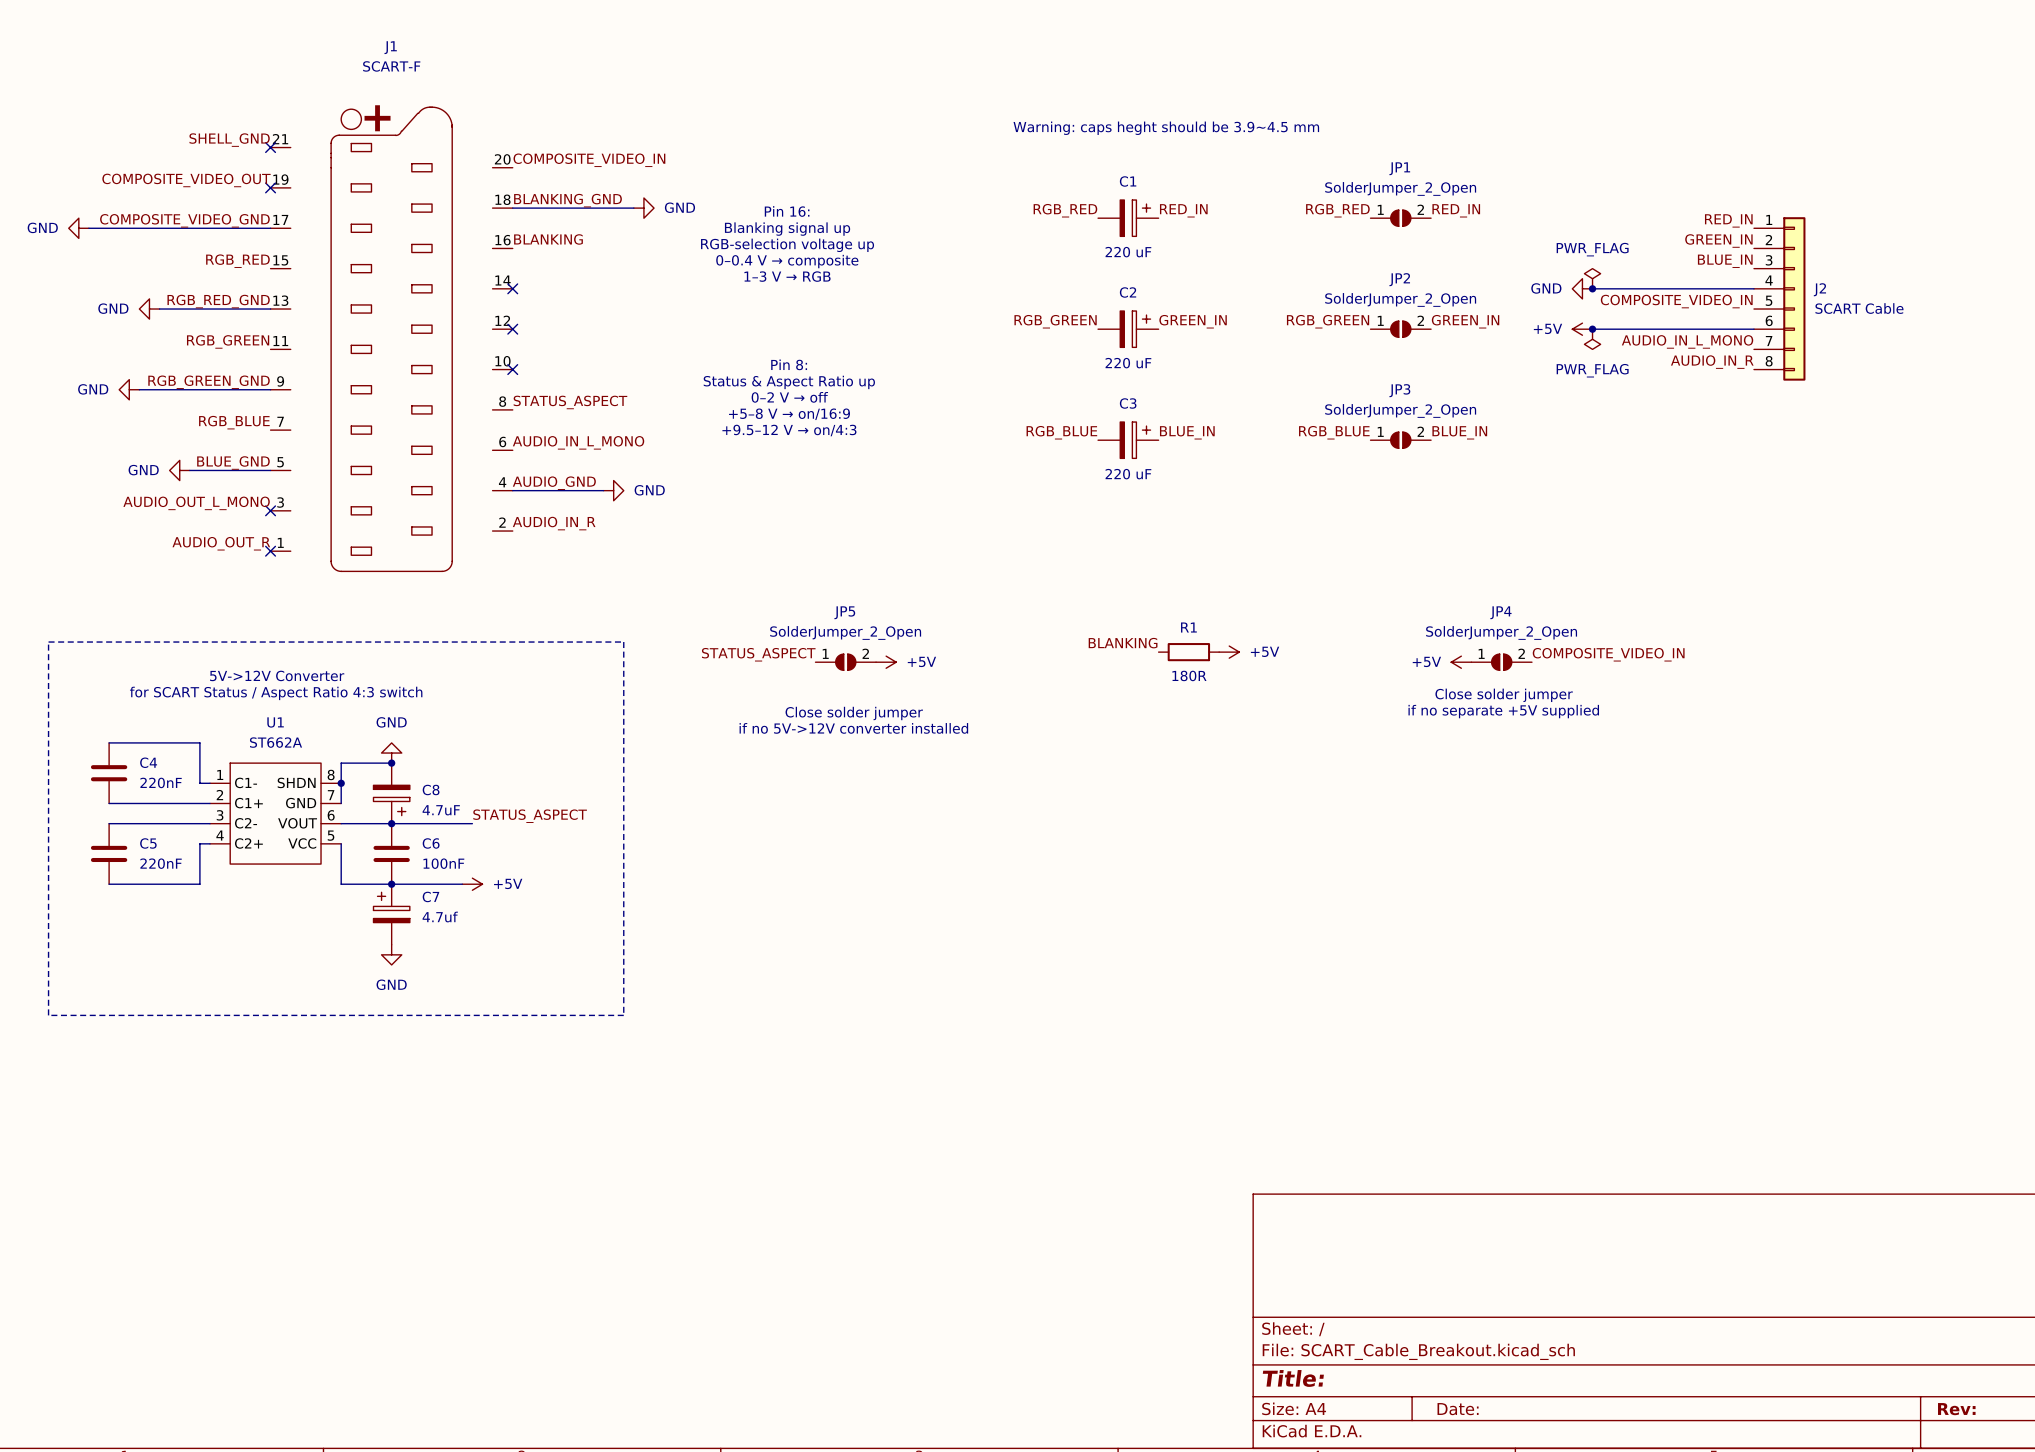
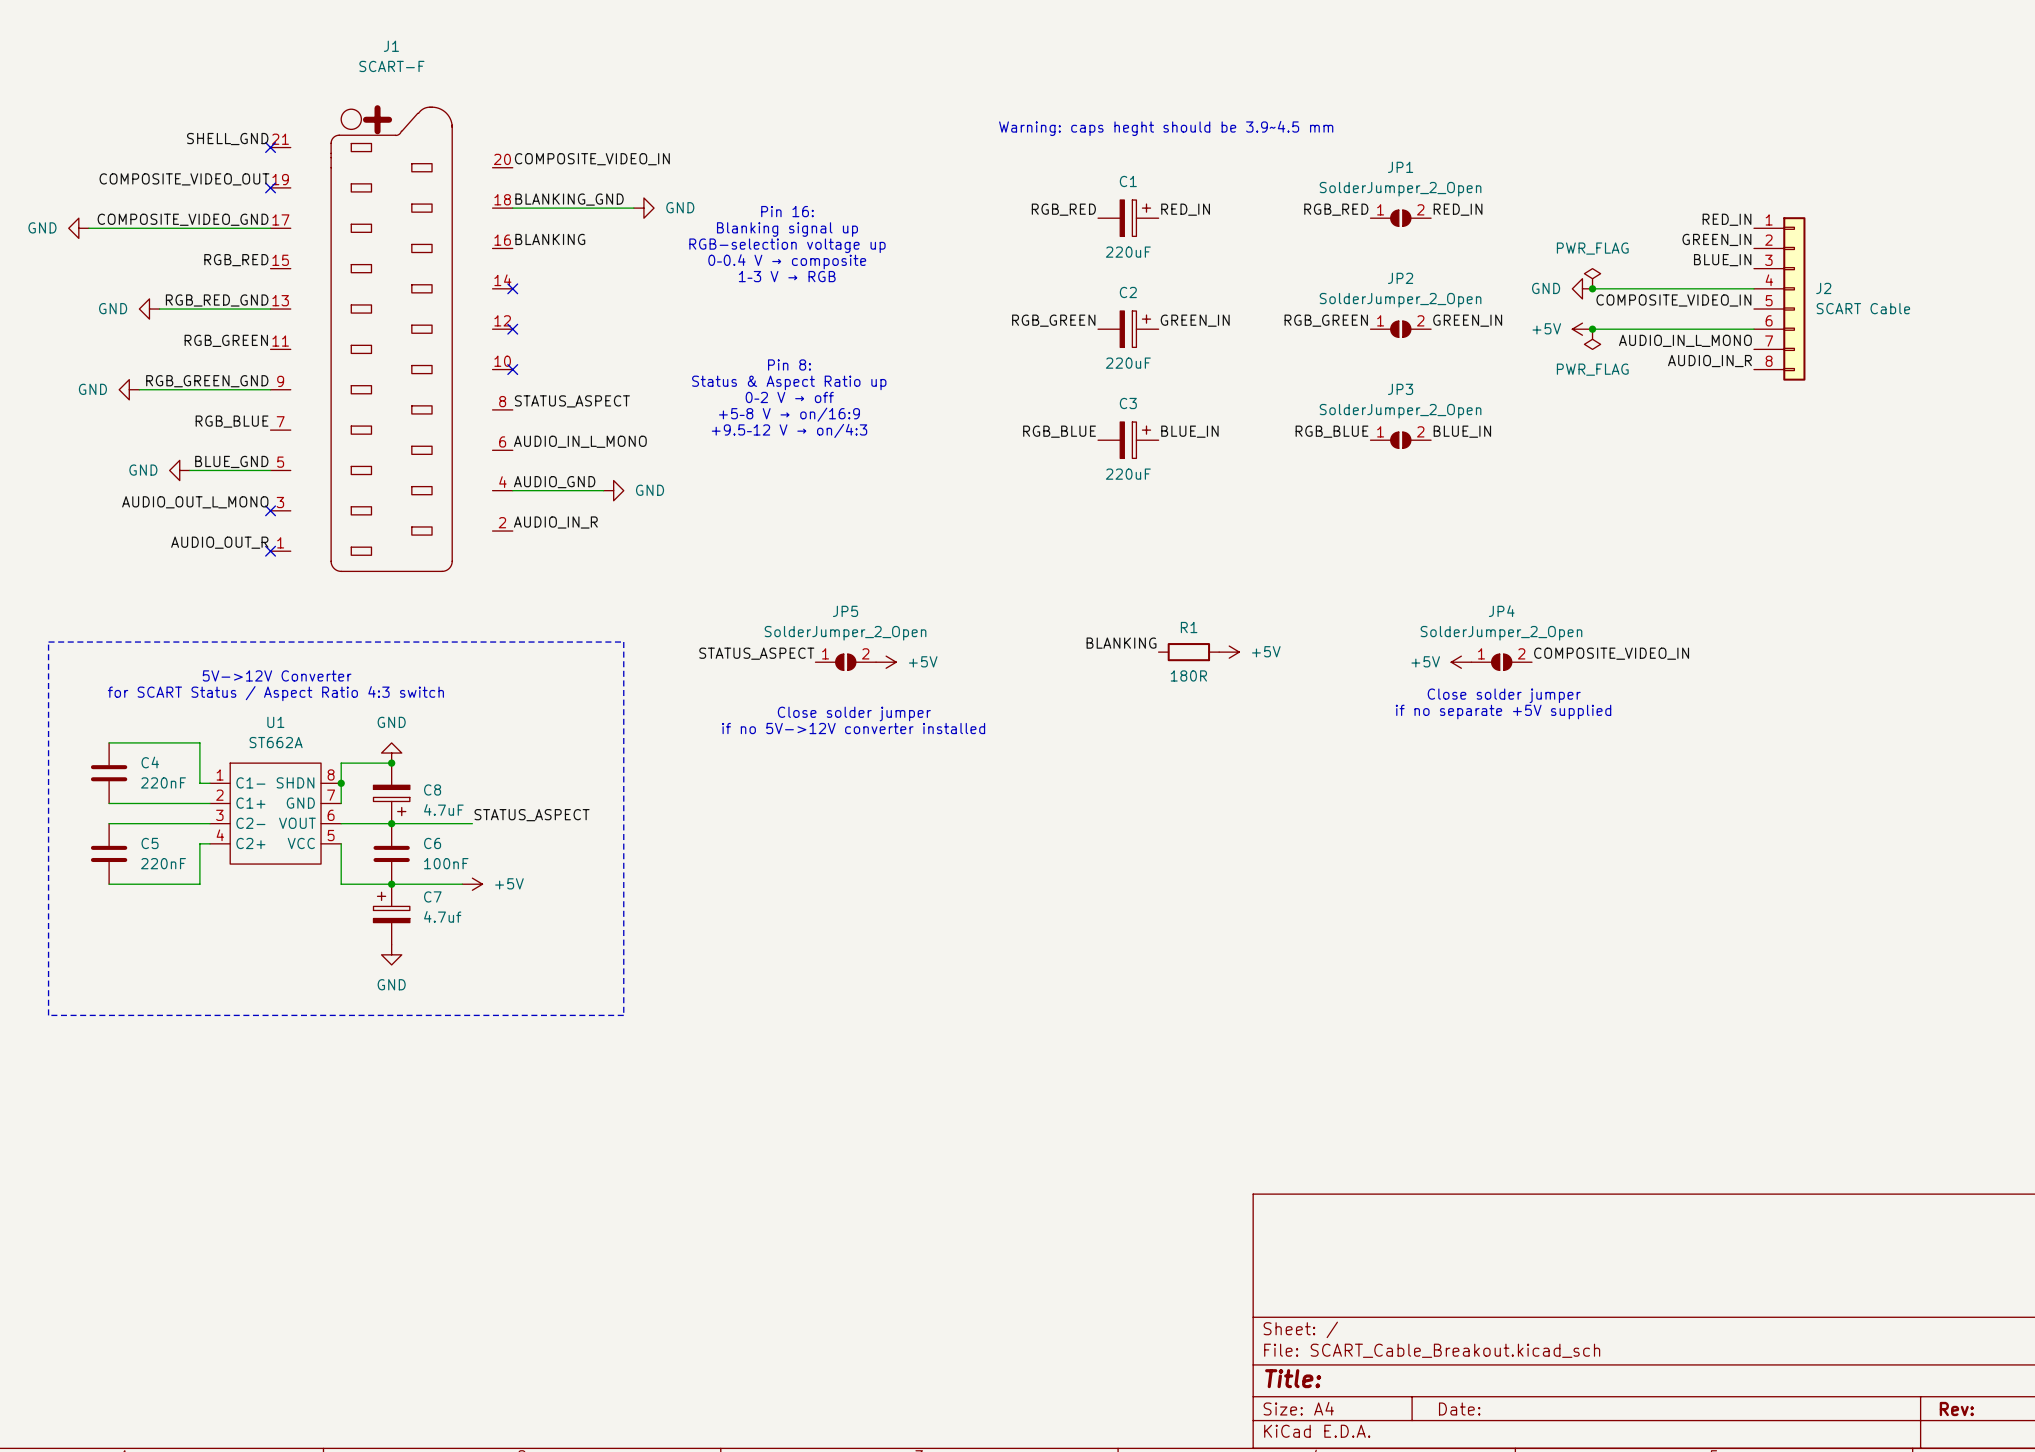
C1 value: 220 uF (1128, 252) -> 220uF (1128, 252)
C2 value: 220 uF (1128, 363) -> 220uF (1128, 363)
C3 value: 220 uF (1128, 474) -> 220uF (1128, 474)

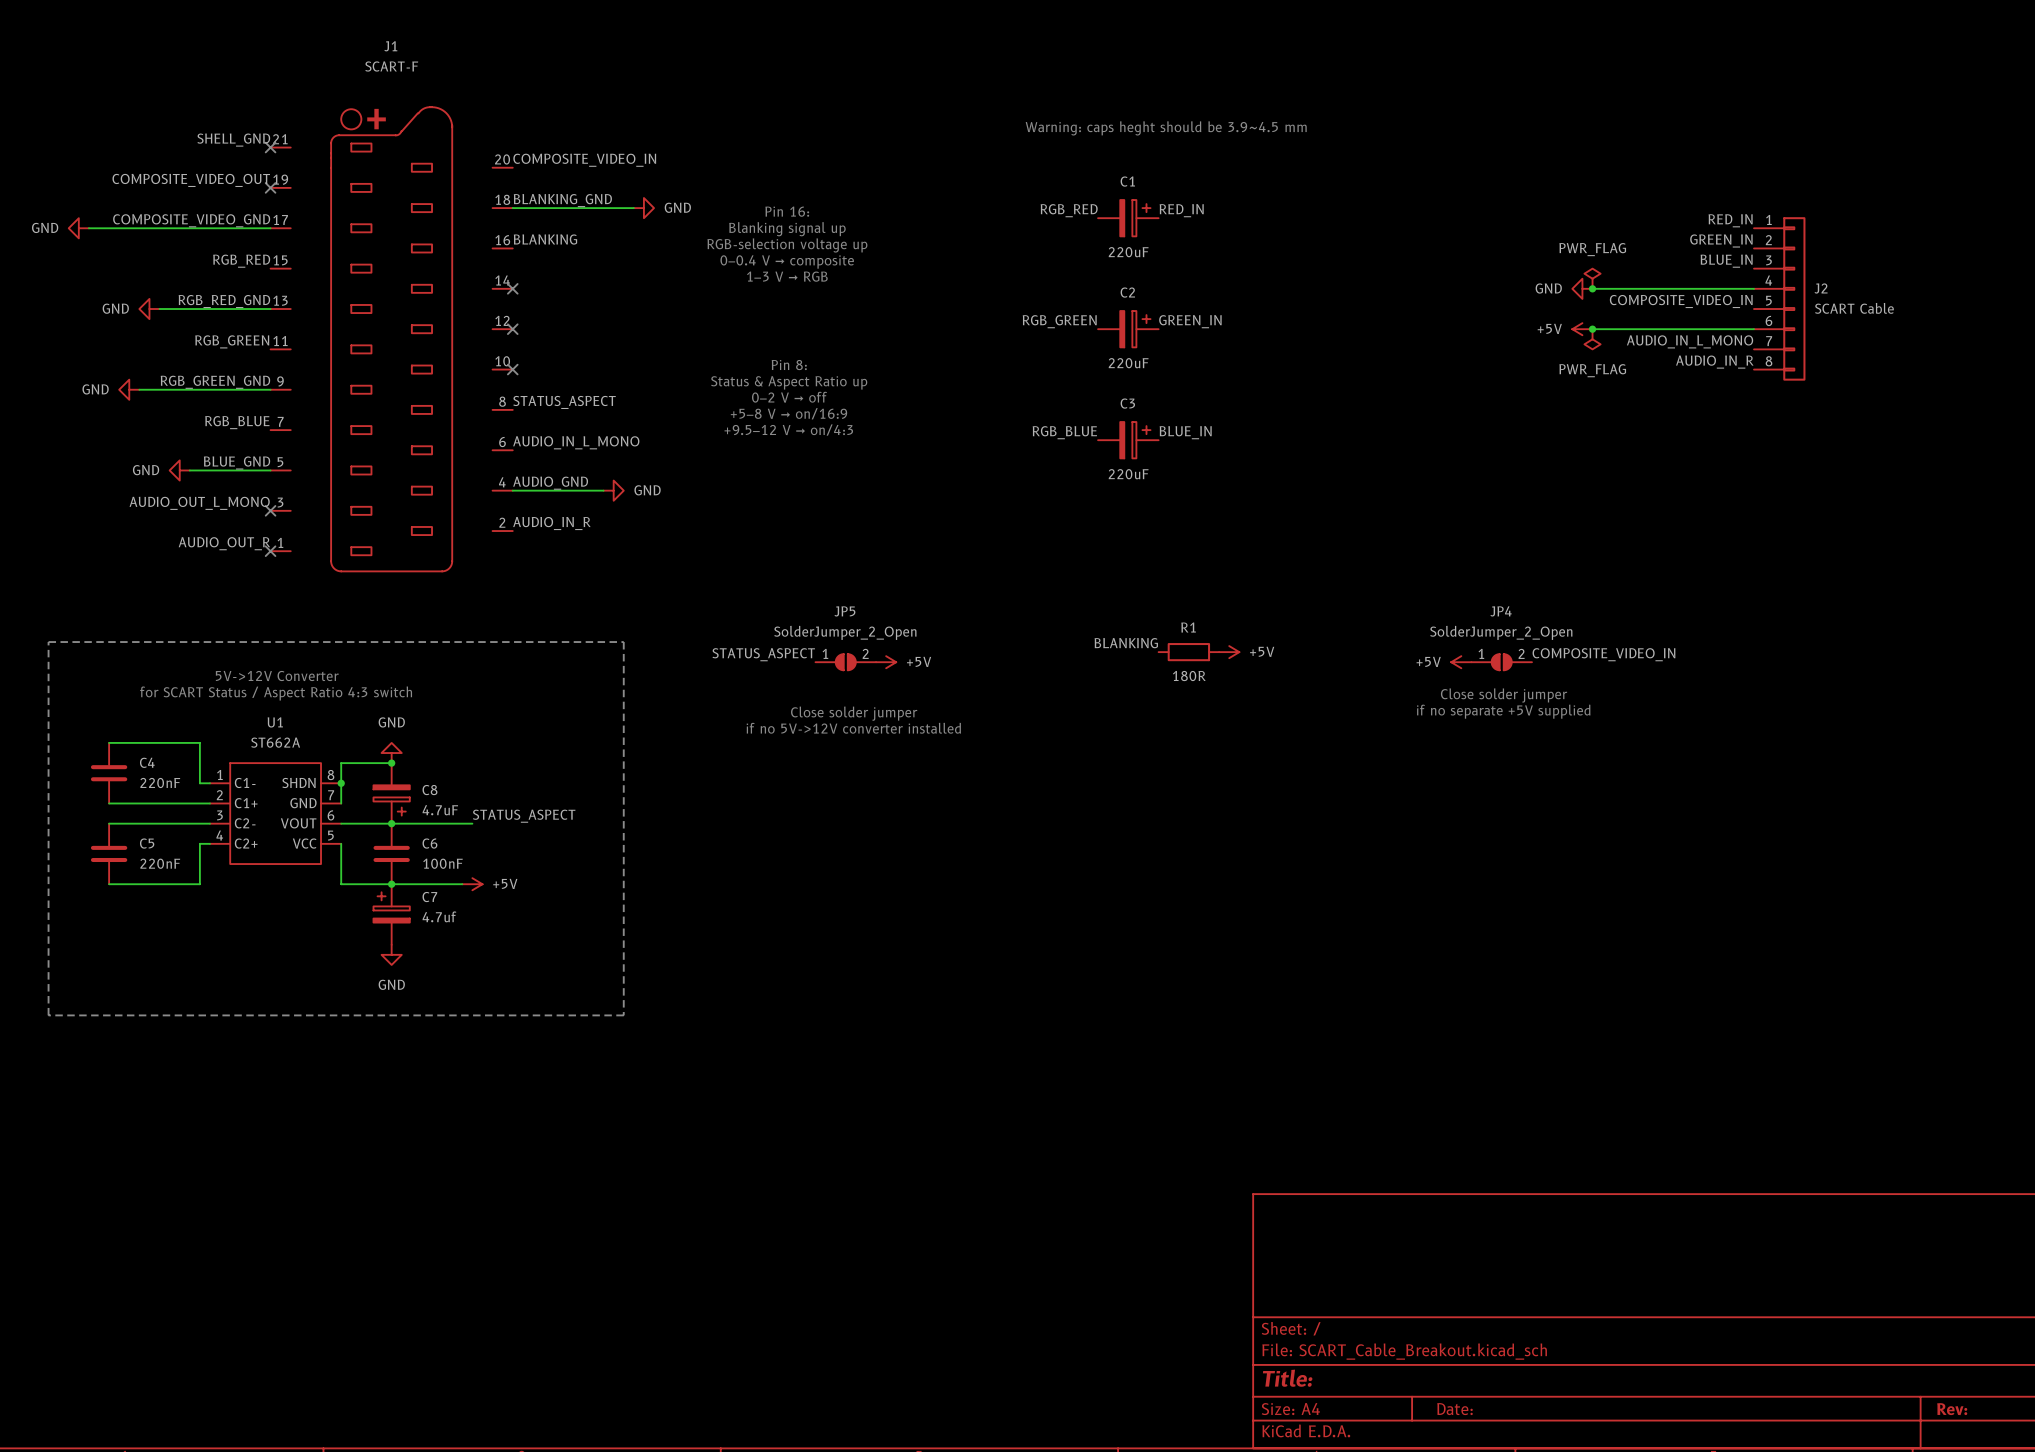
label: RGB_RED (1336, 209) -> none
label: RED_IN (1458, 209) -> none
JP1: SolderJumper_2_Open (1400, 218) -> none
label: RGB_GREEN (1326, 320) -> none
label: GREEN_IN (1467, 320) -> none
JP2: SolderJumper_2_Open (1400, 329) -> none
label: RGB_BLUE (1332, 431) -> none
label: BLUE_IN (1462, 431) -> none
JP3: SolderJumper_2_Open (1400, 440) -> none

